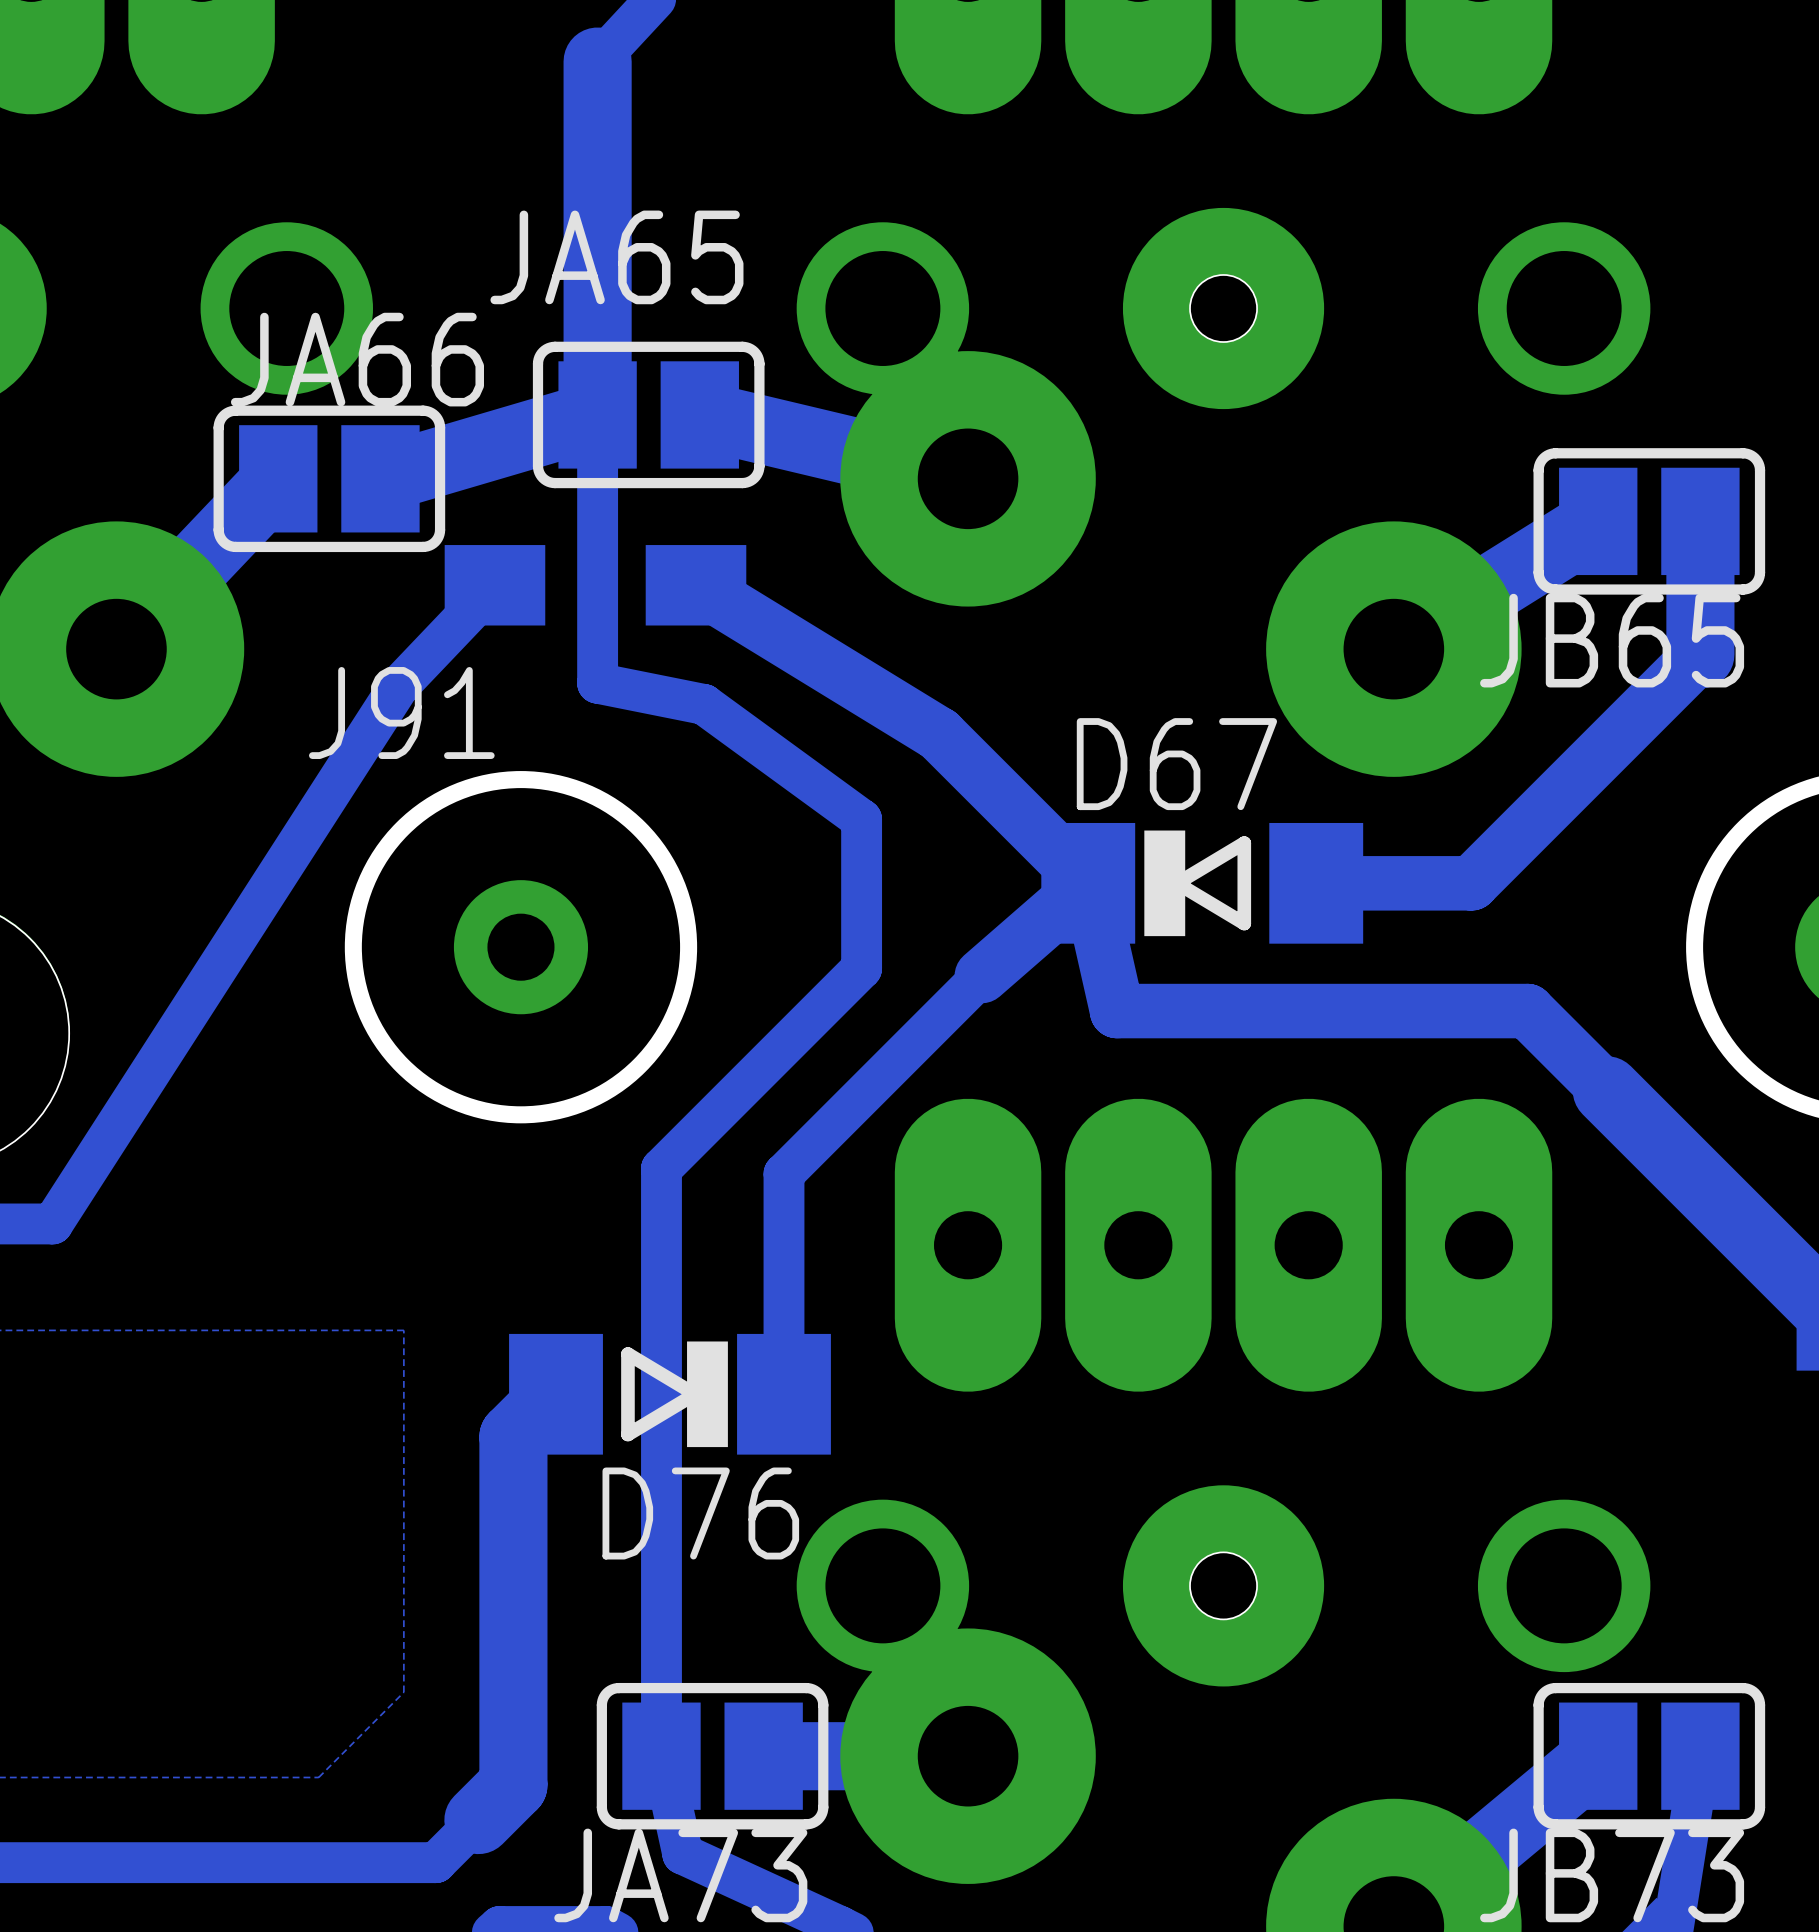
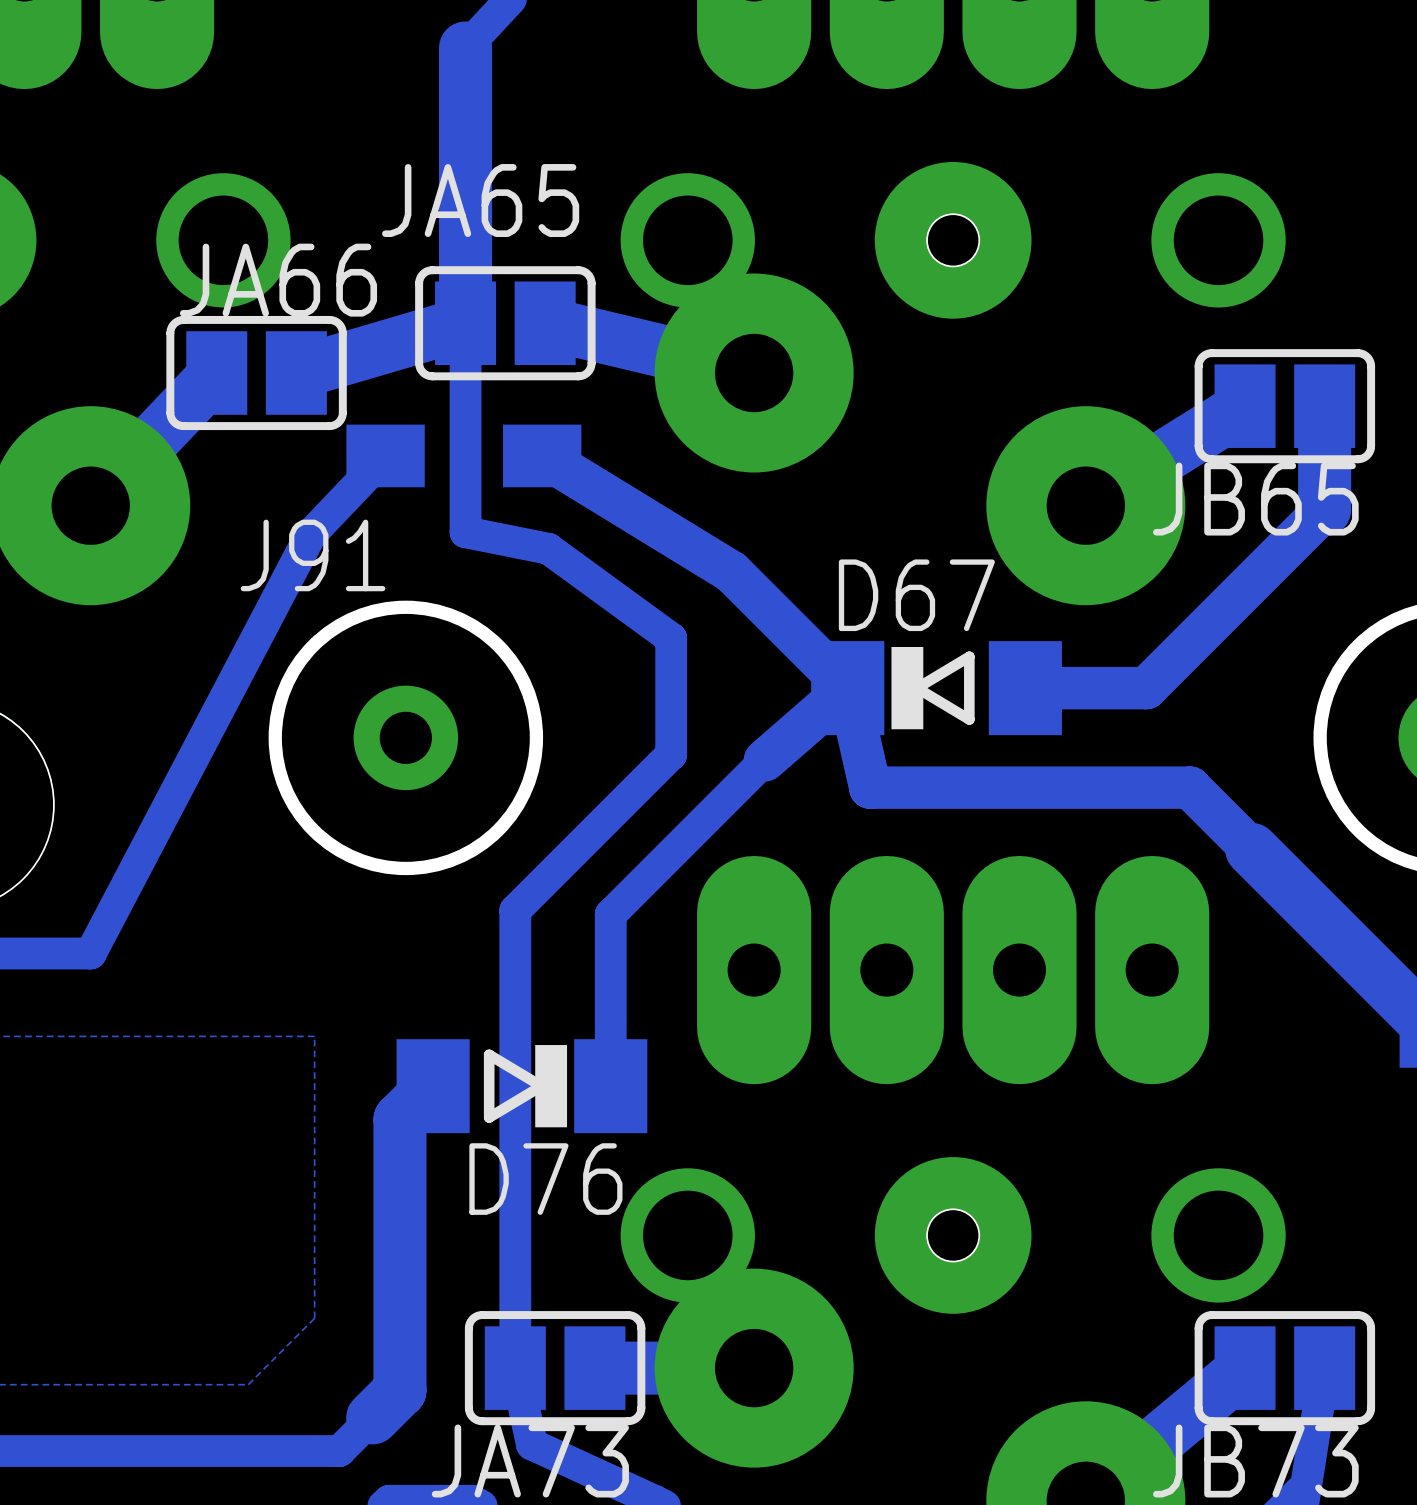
bottom track: (399, 685) (52, 1223) -> (310, 534) (90, 953) (40, 953)

